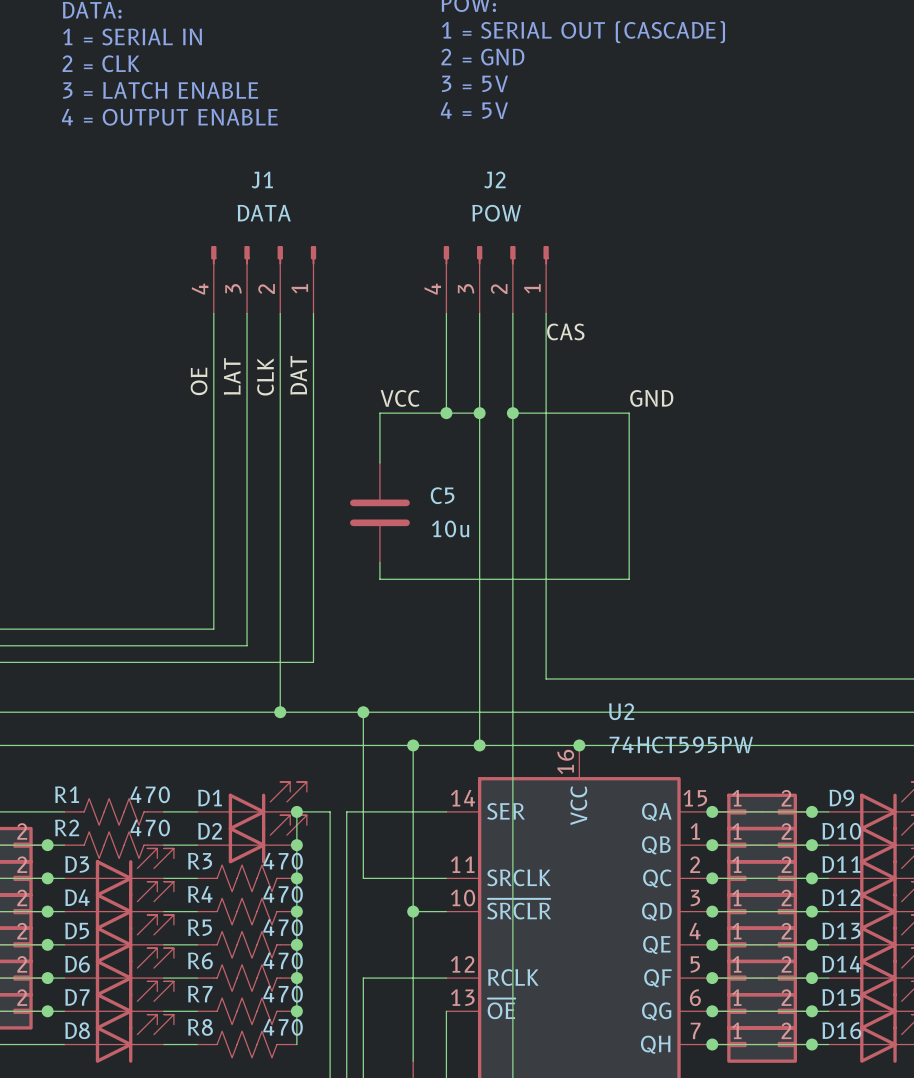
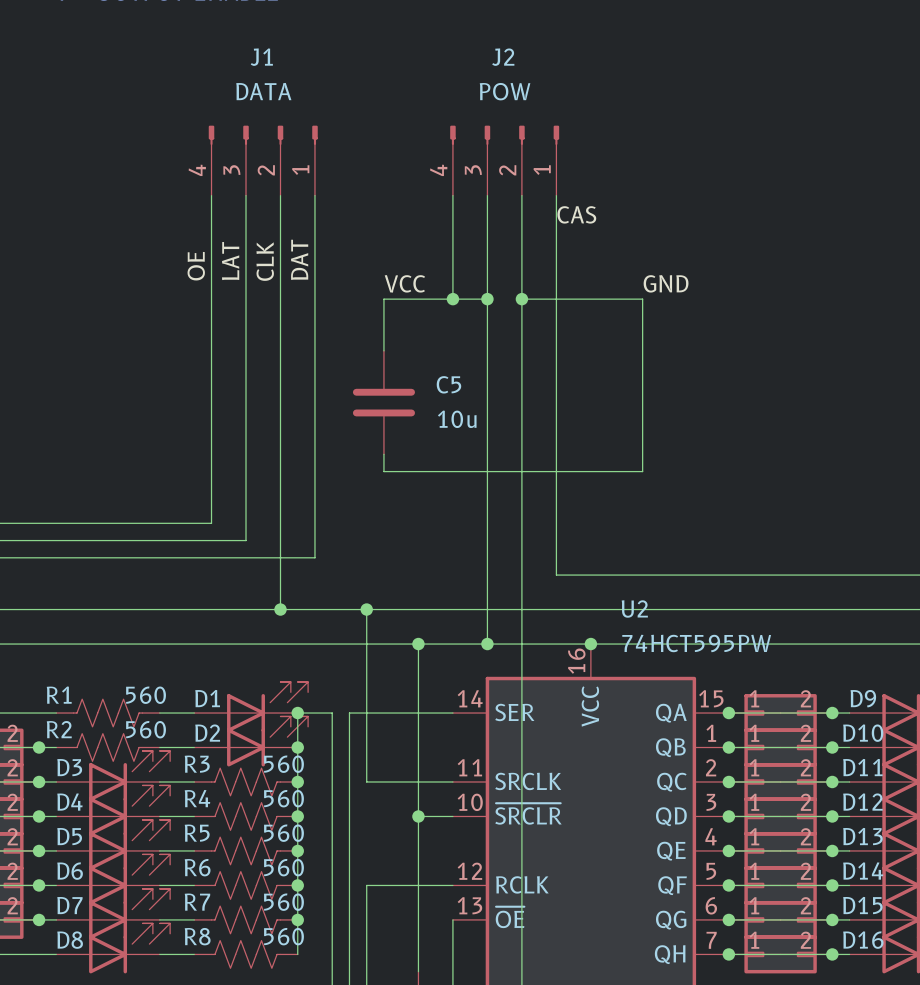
R1 value: 470 (150, 794) -> 560 (146, 695)
R2 value: 470 (150, 828) -> 560 (146, 729)
R3 value: 470 (283, 861) -> 560 (284, 764)
R4 value: 470 (283, 894) -> 560 (284, 798)
R5 value: 470 (283, 927) -> 560 (284, 833)
R6 value: 470 (283, 960) -> 560 (284, 867)
R7 value: 470 (283, 994) -> 560 (284, 902)
R8 value: 470 (283, 1027) -> 560 (284, 936)

